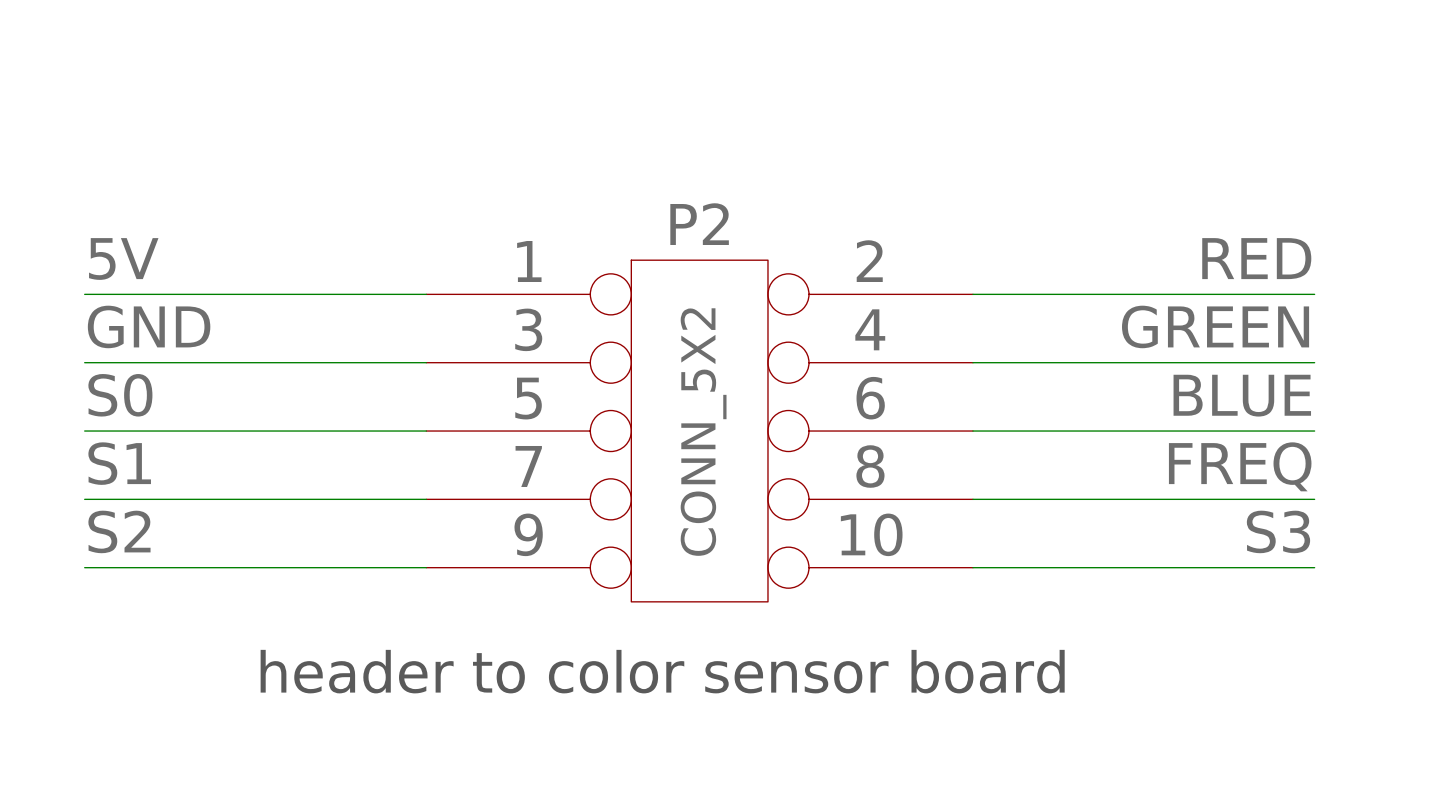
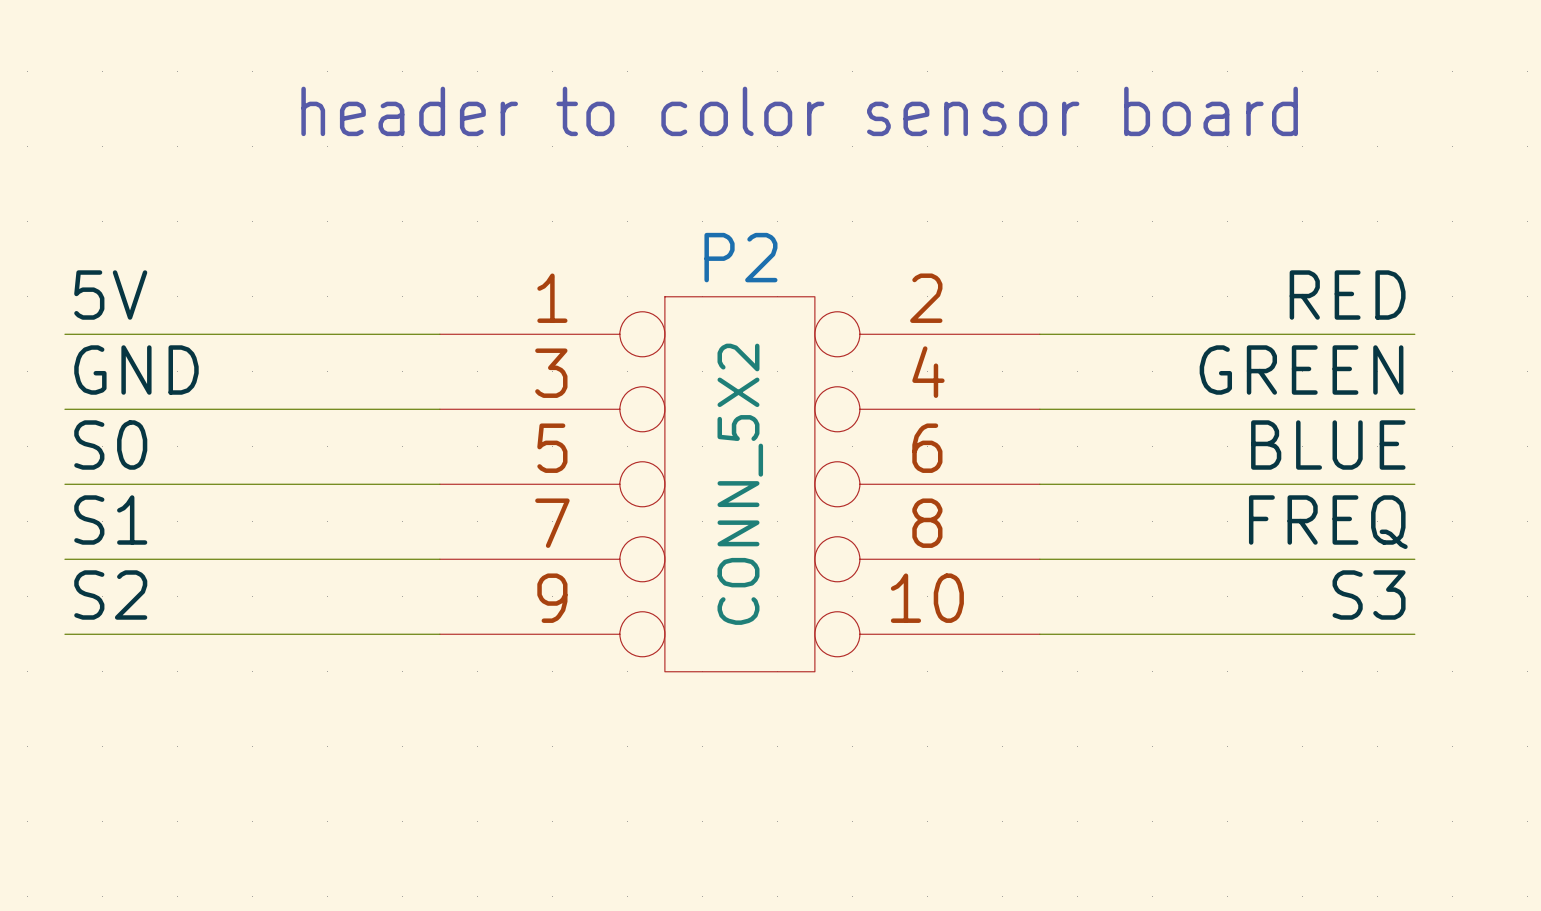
text position: header to color sensor board (662, 671) -> header to color sensor board (799, 111)

